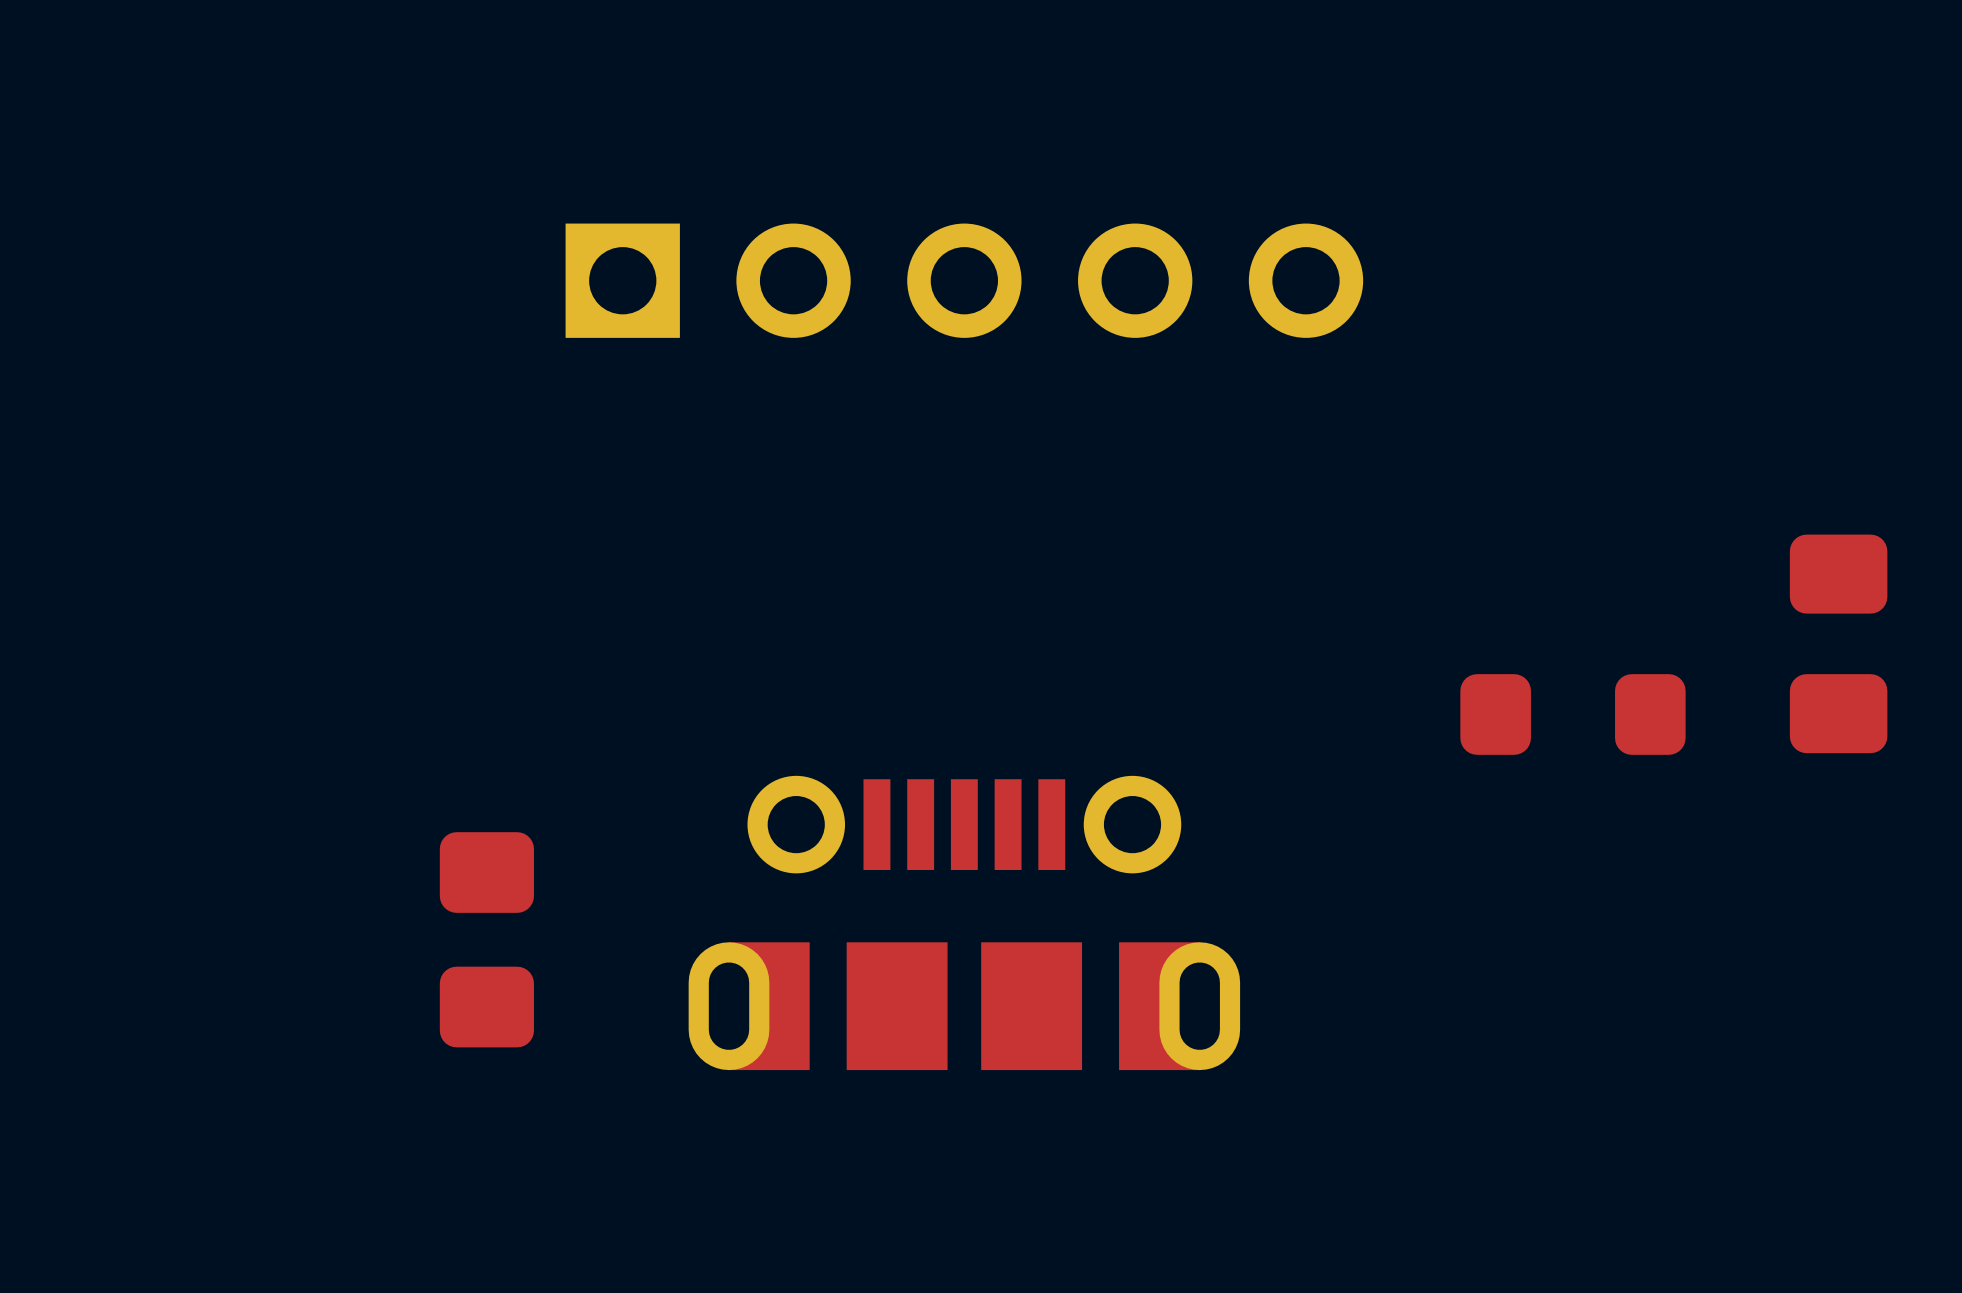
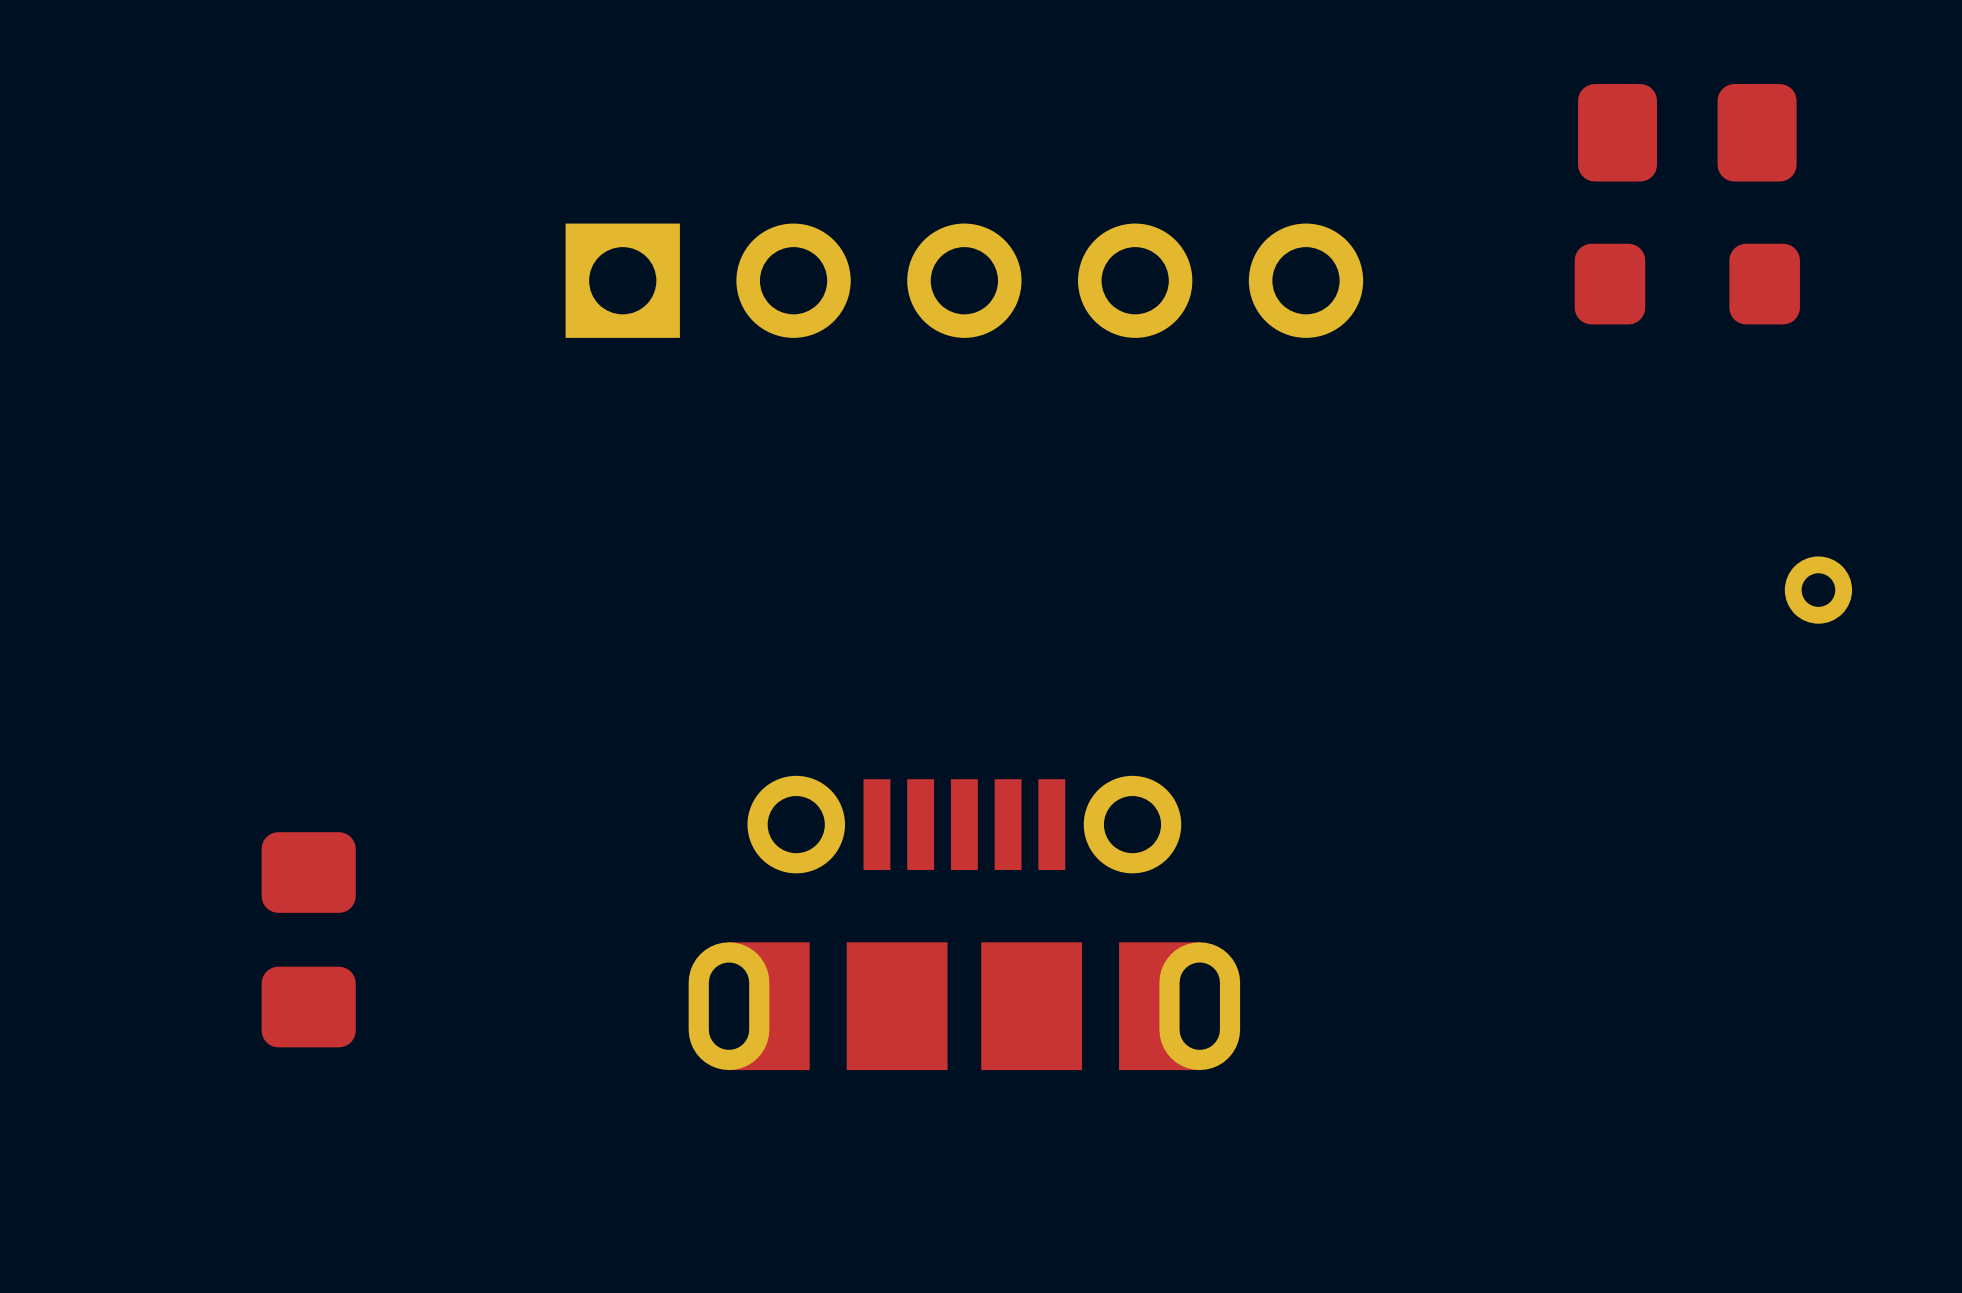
part: none -> (1687, 132)
part footprint: [1789, 534, 1888, 754] -> [1784, 556, 1853, 624]
part position: (1572, 714) -> (1687, 284)
part position: (486, 939) -> (308, 939)

